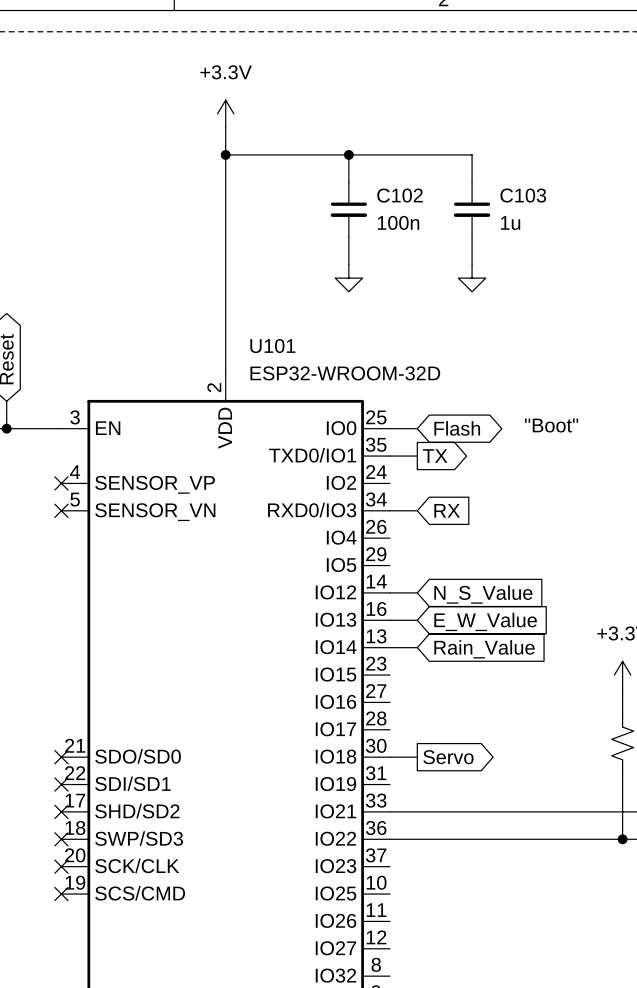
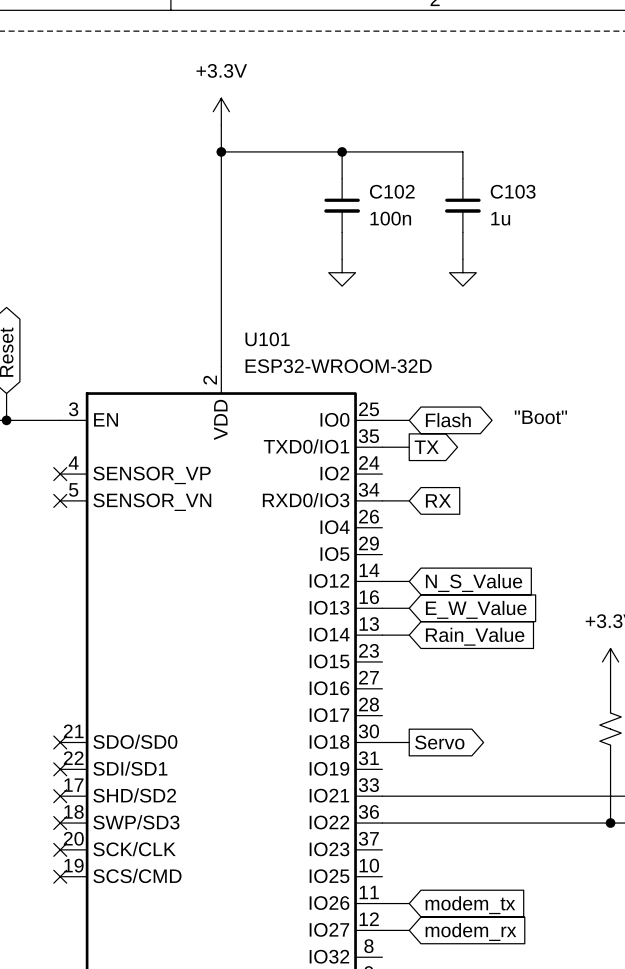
wire: none -> (382, 903) (409, 903)
global label: none -> modem_tx (470, 905)
wire: none -> (382, 930) (409, 930)
global label: none -> modem_rx (470, 931)

